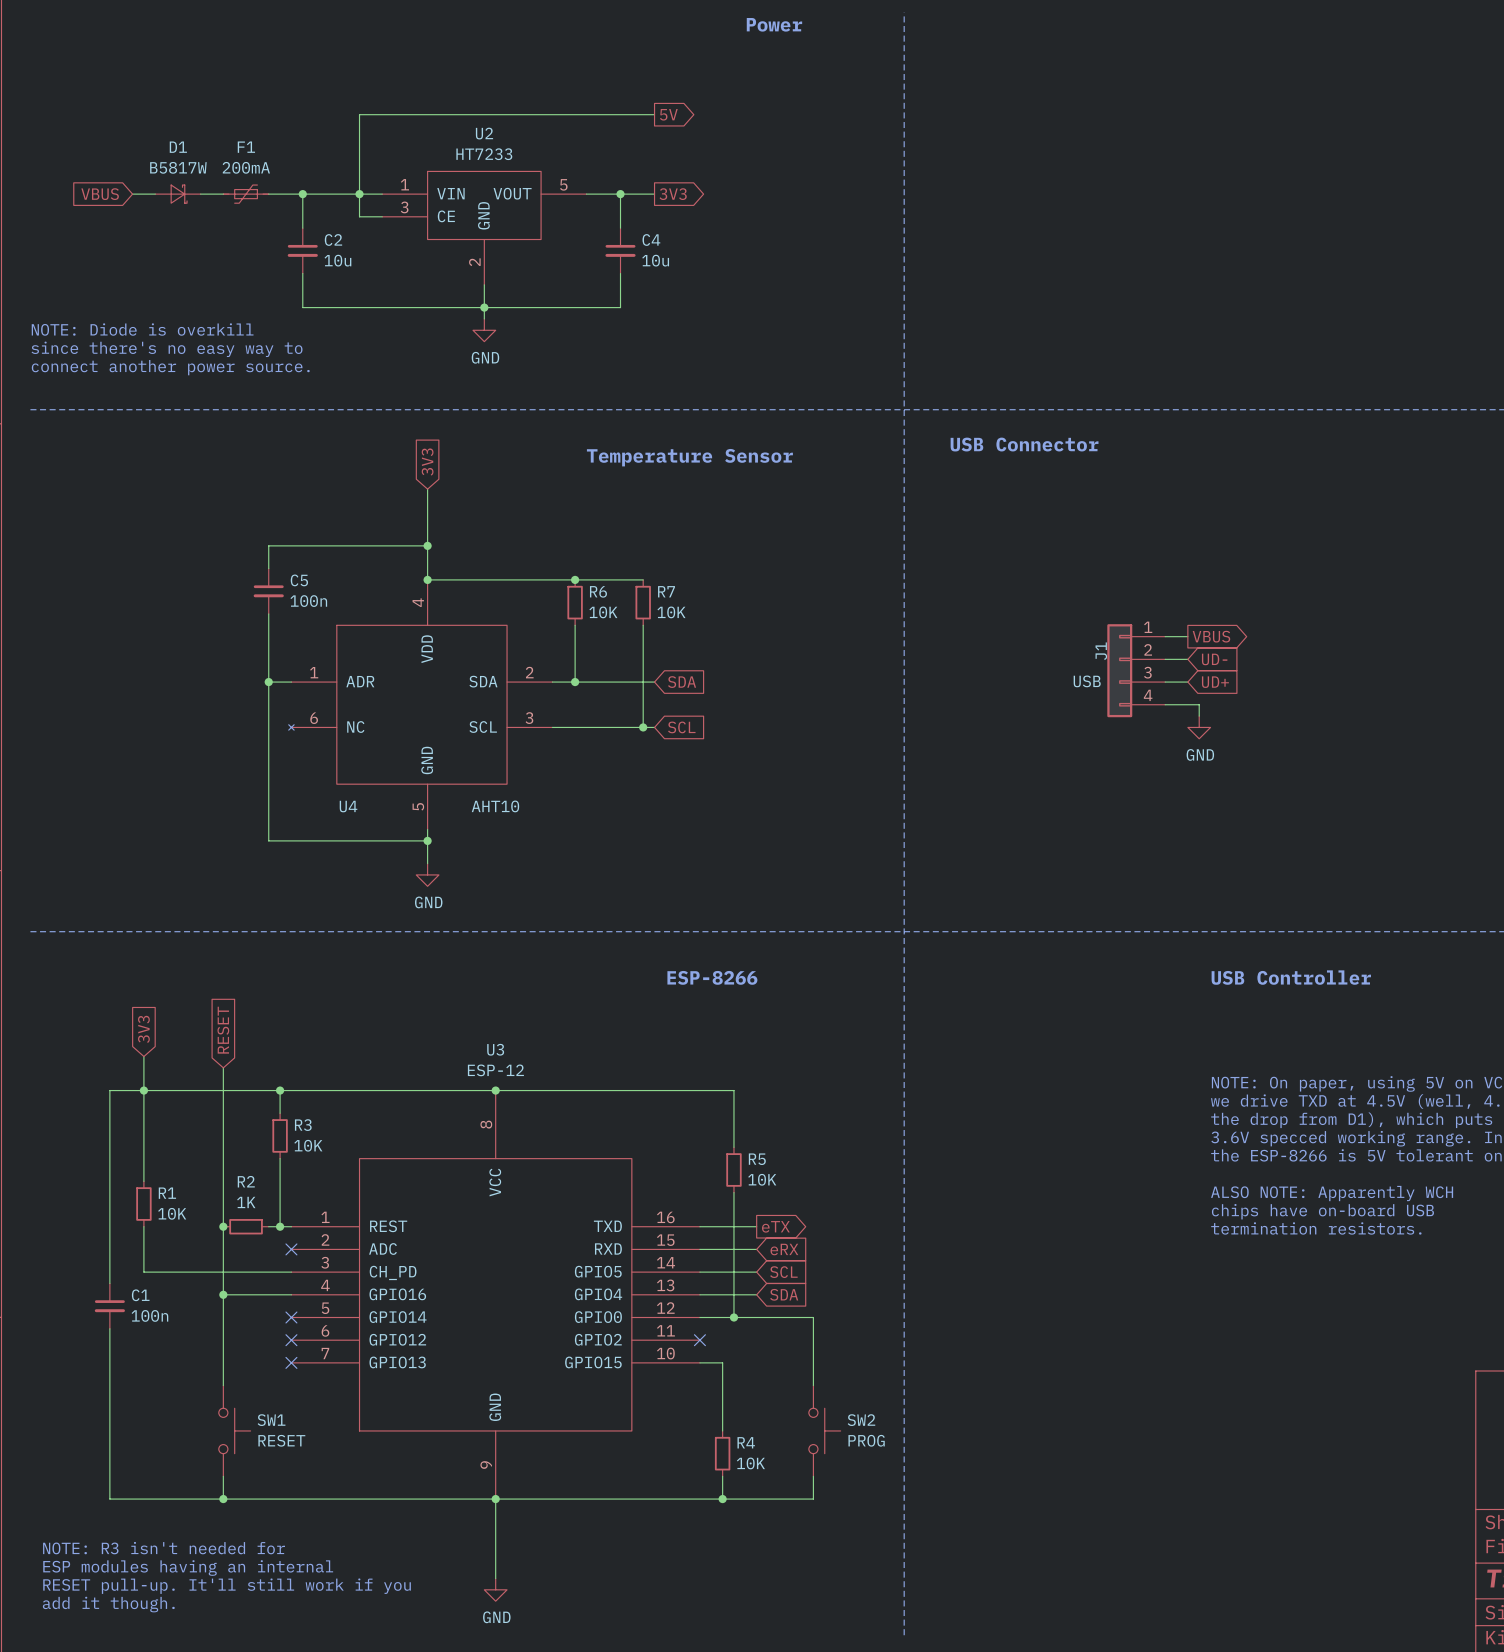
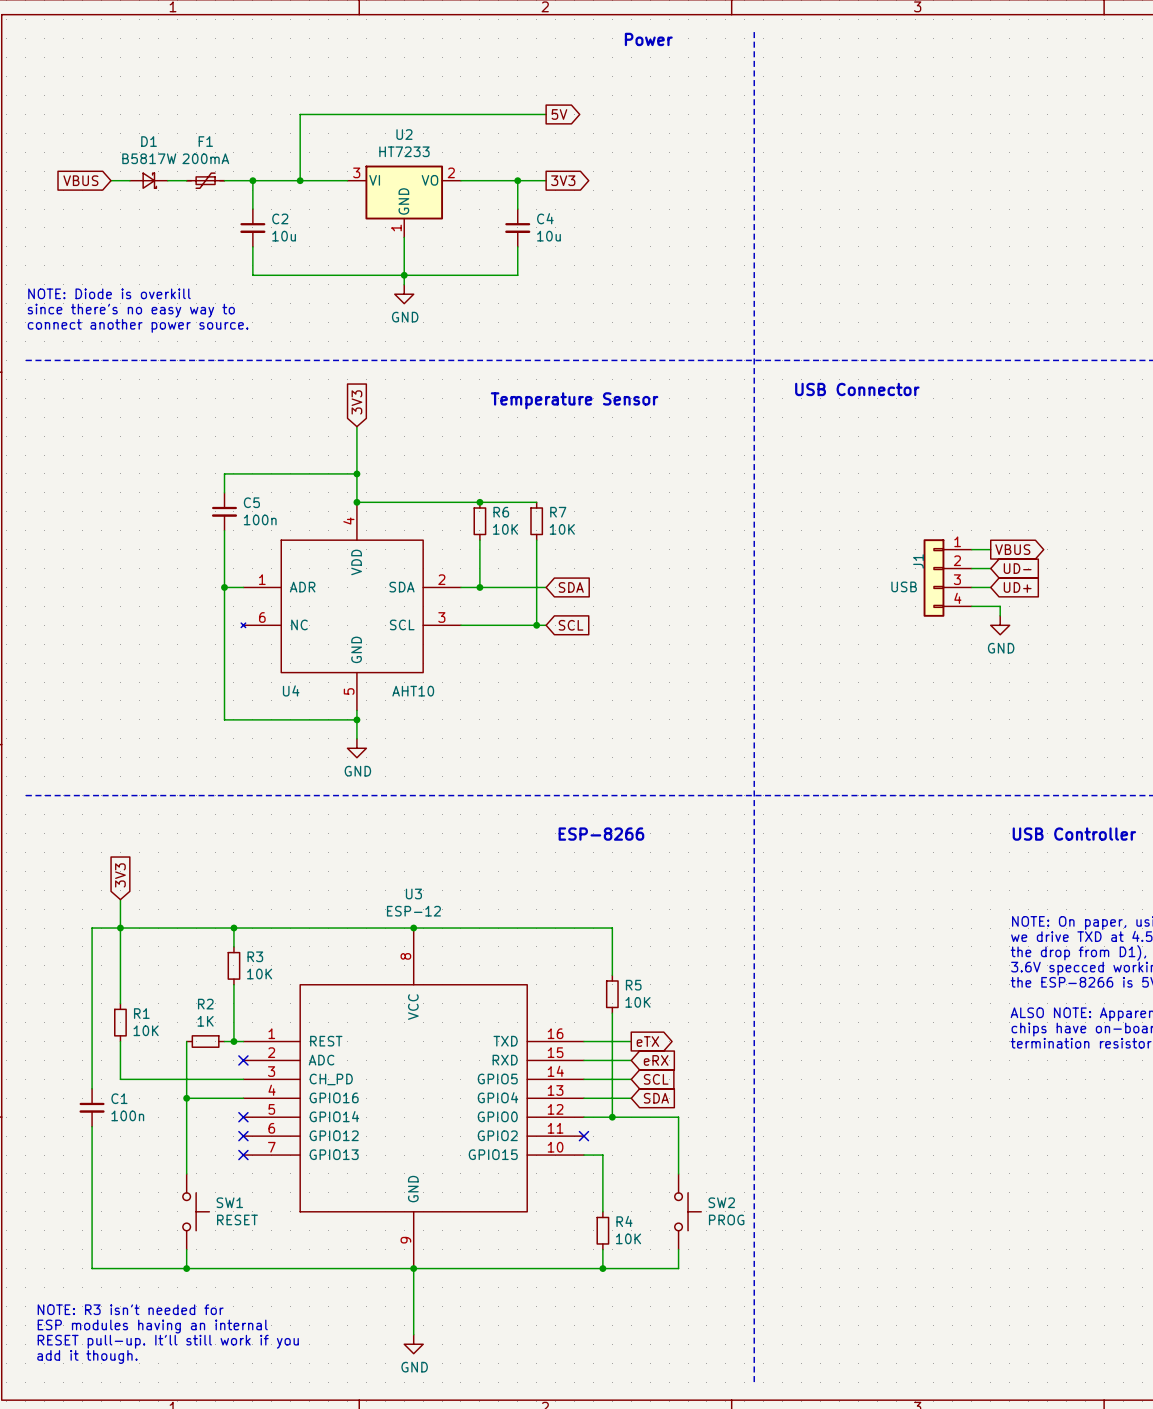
U2 symbol: [382, 171, 587, 285] -> [347, 165, 461, 238]
wire: (359, 194) (359, 216) (382, 216) -> none
global label: RESET (223, 1030) -> none
wire: (223, 1067) (223, 1226) -> none
junction: (223, 1226) -> none

